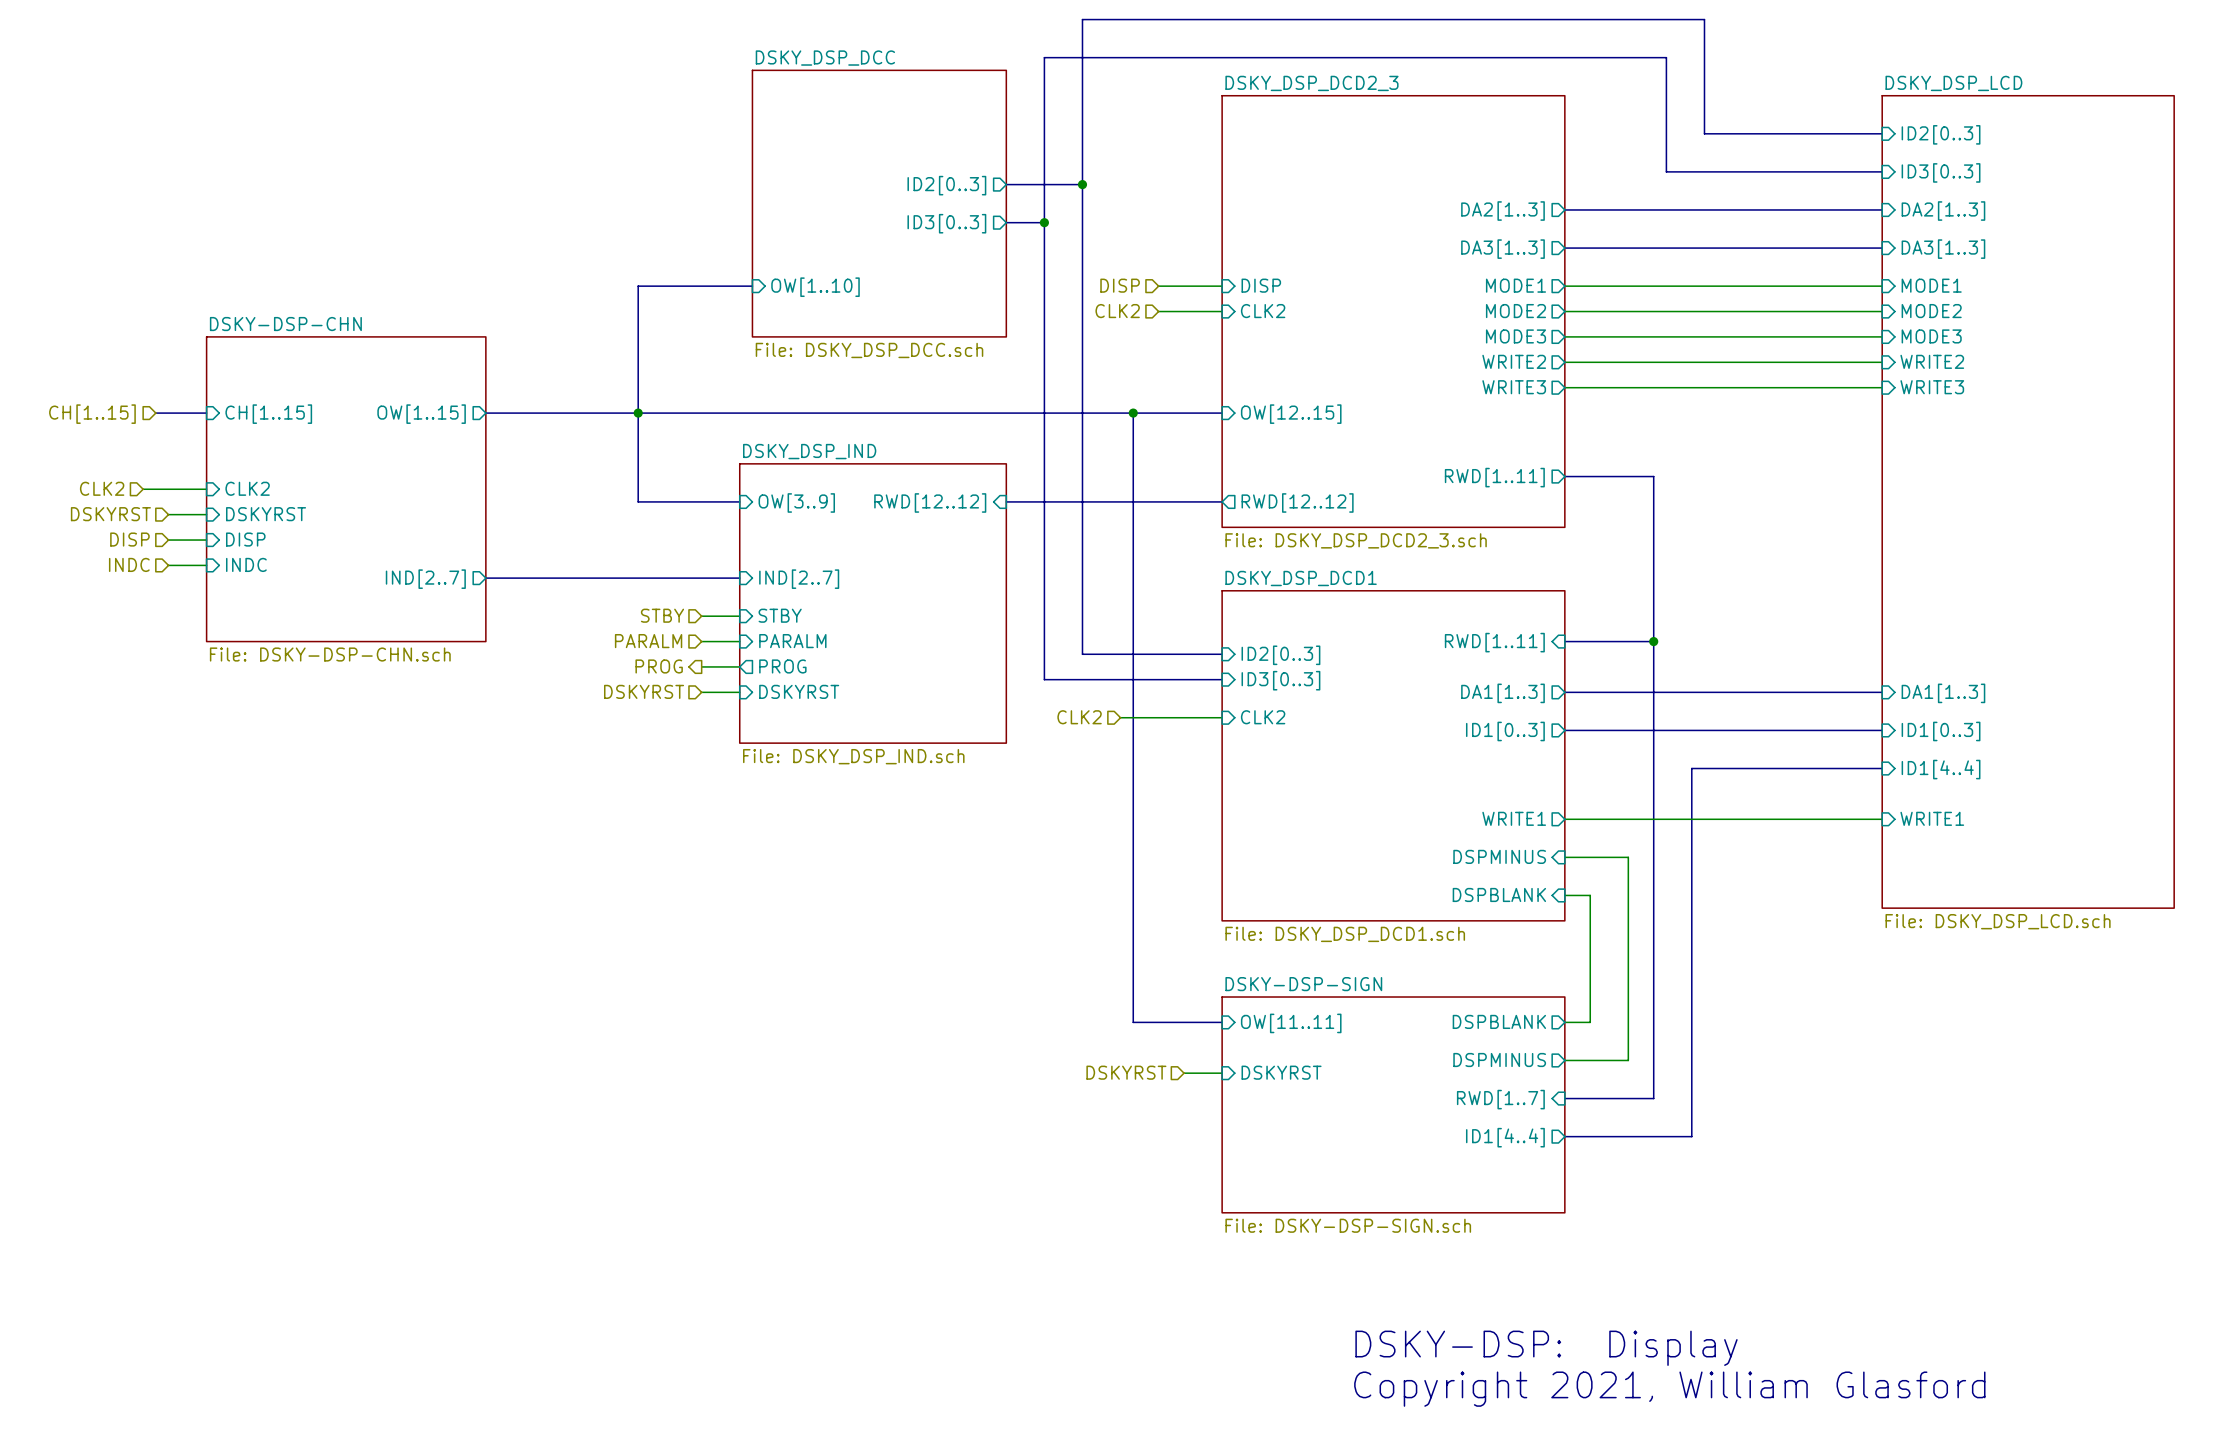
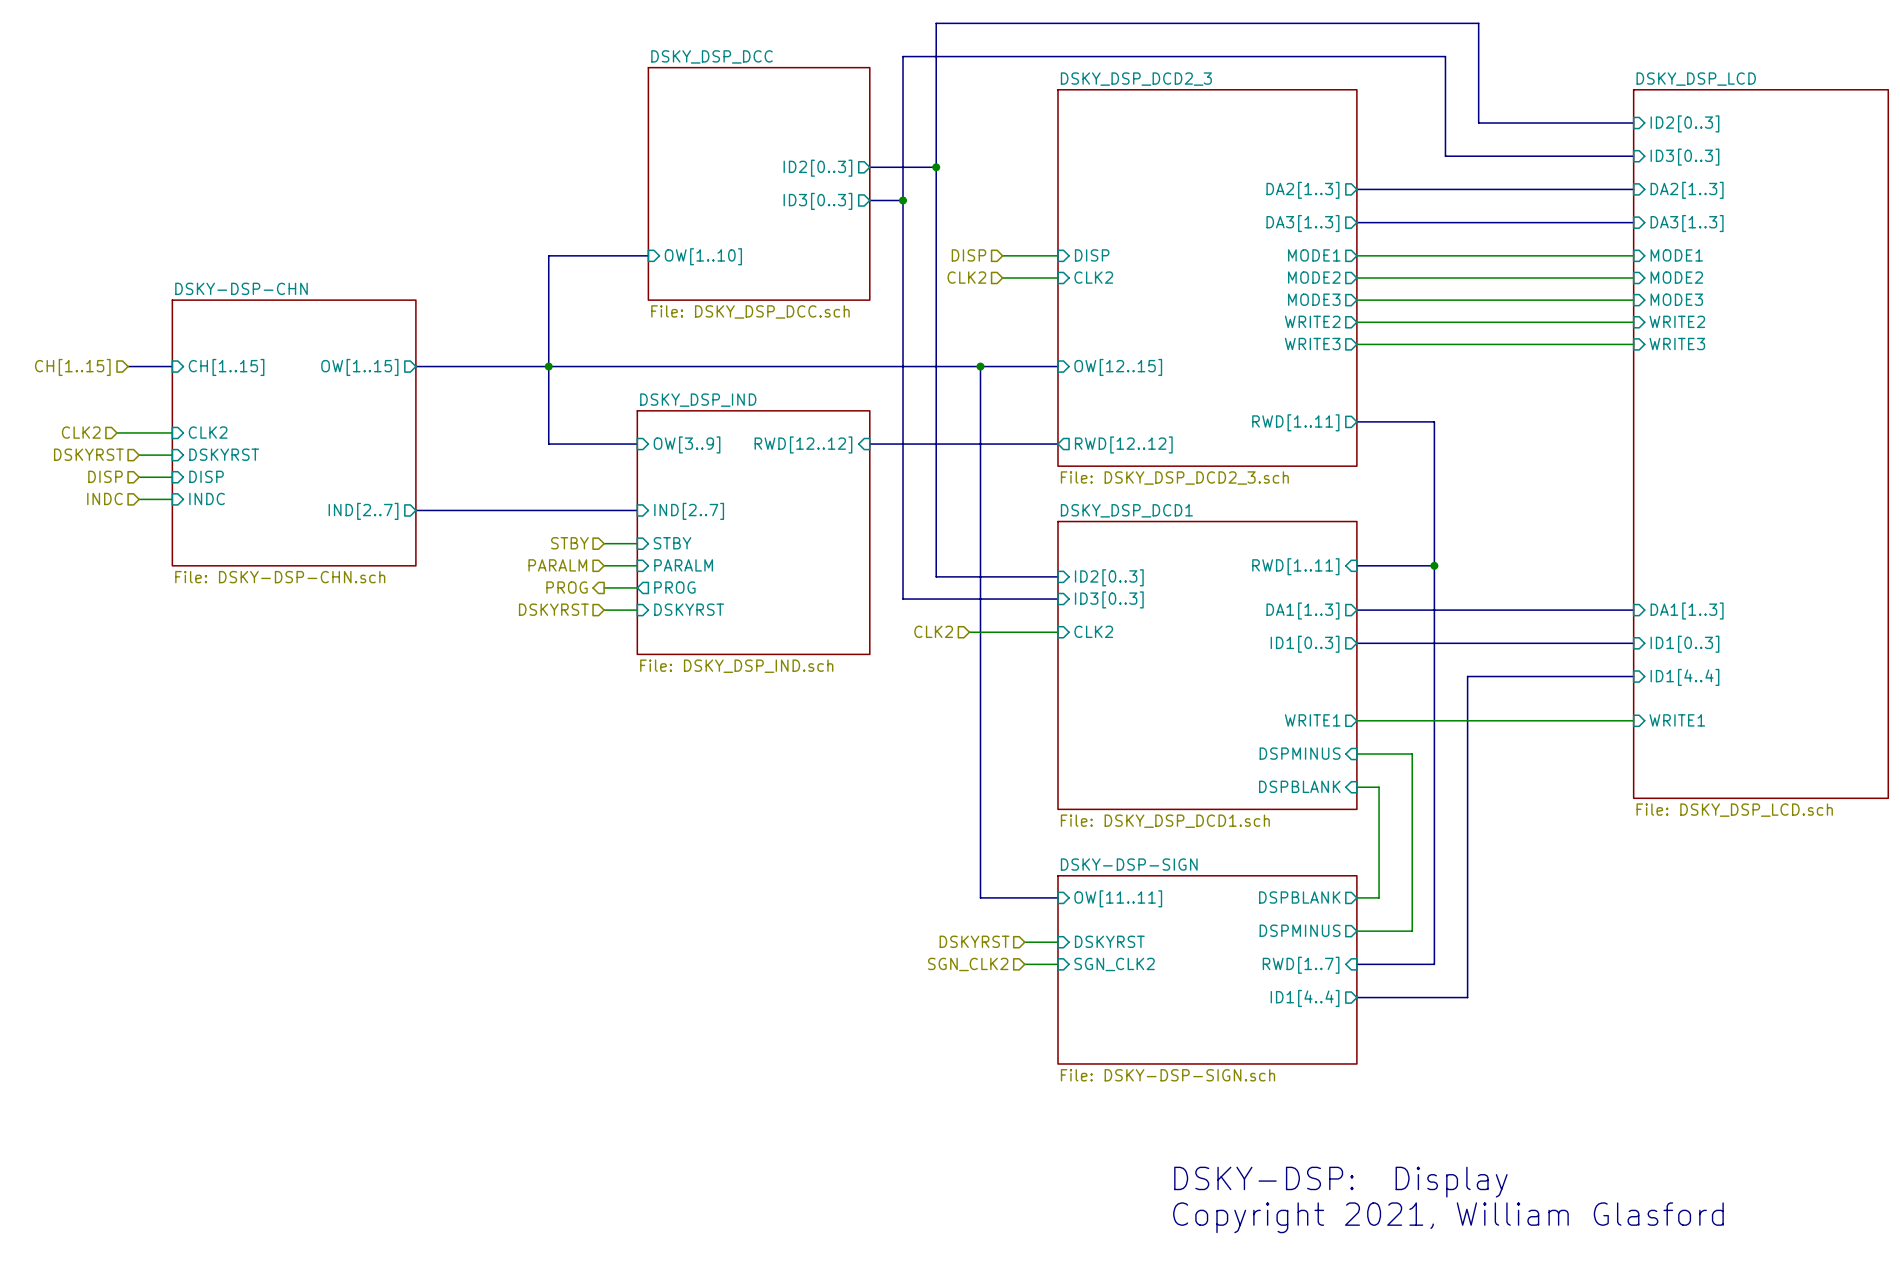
hierarchical label: none -> SGN_CLK2 (968, 964)
wire: none -> (1024, 964) (1057, 964)
sheet pin: none -> SGN_CLK2 (1114, 964)

